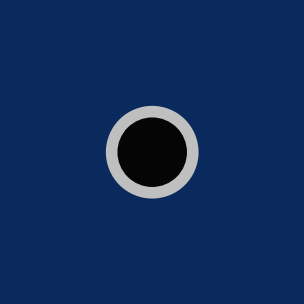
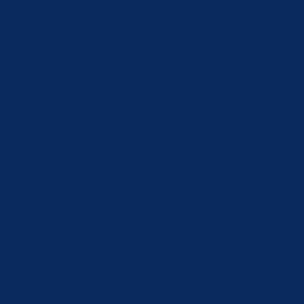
via: (152, 152) -> none

